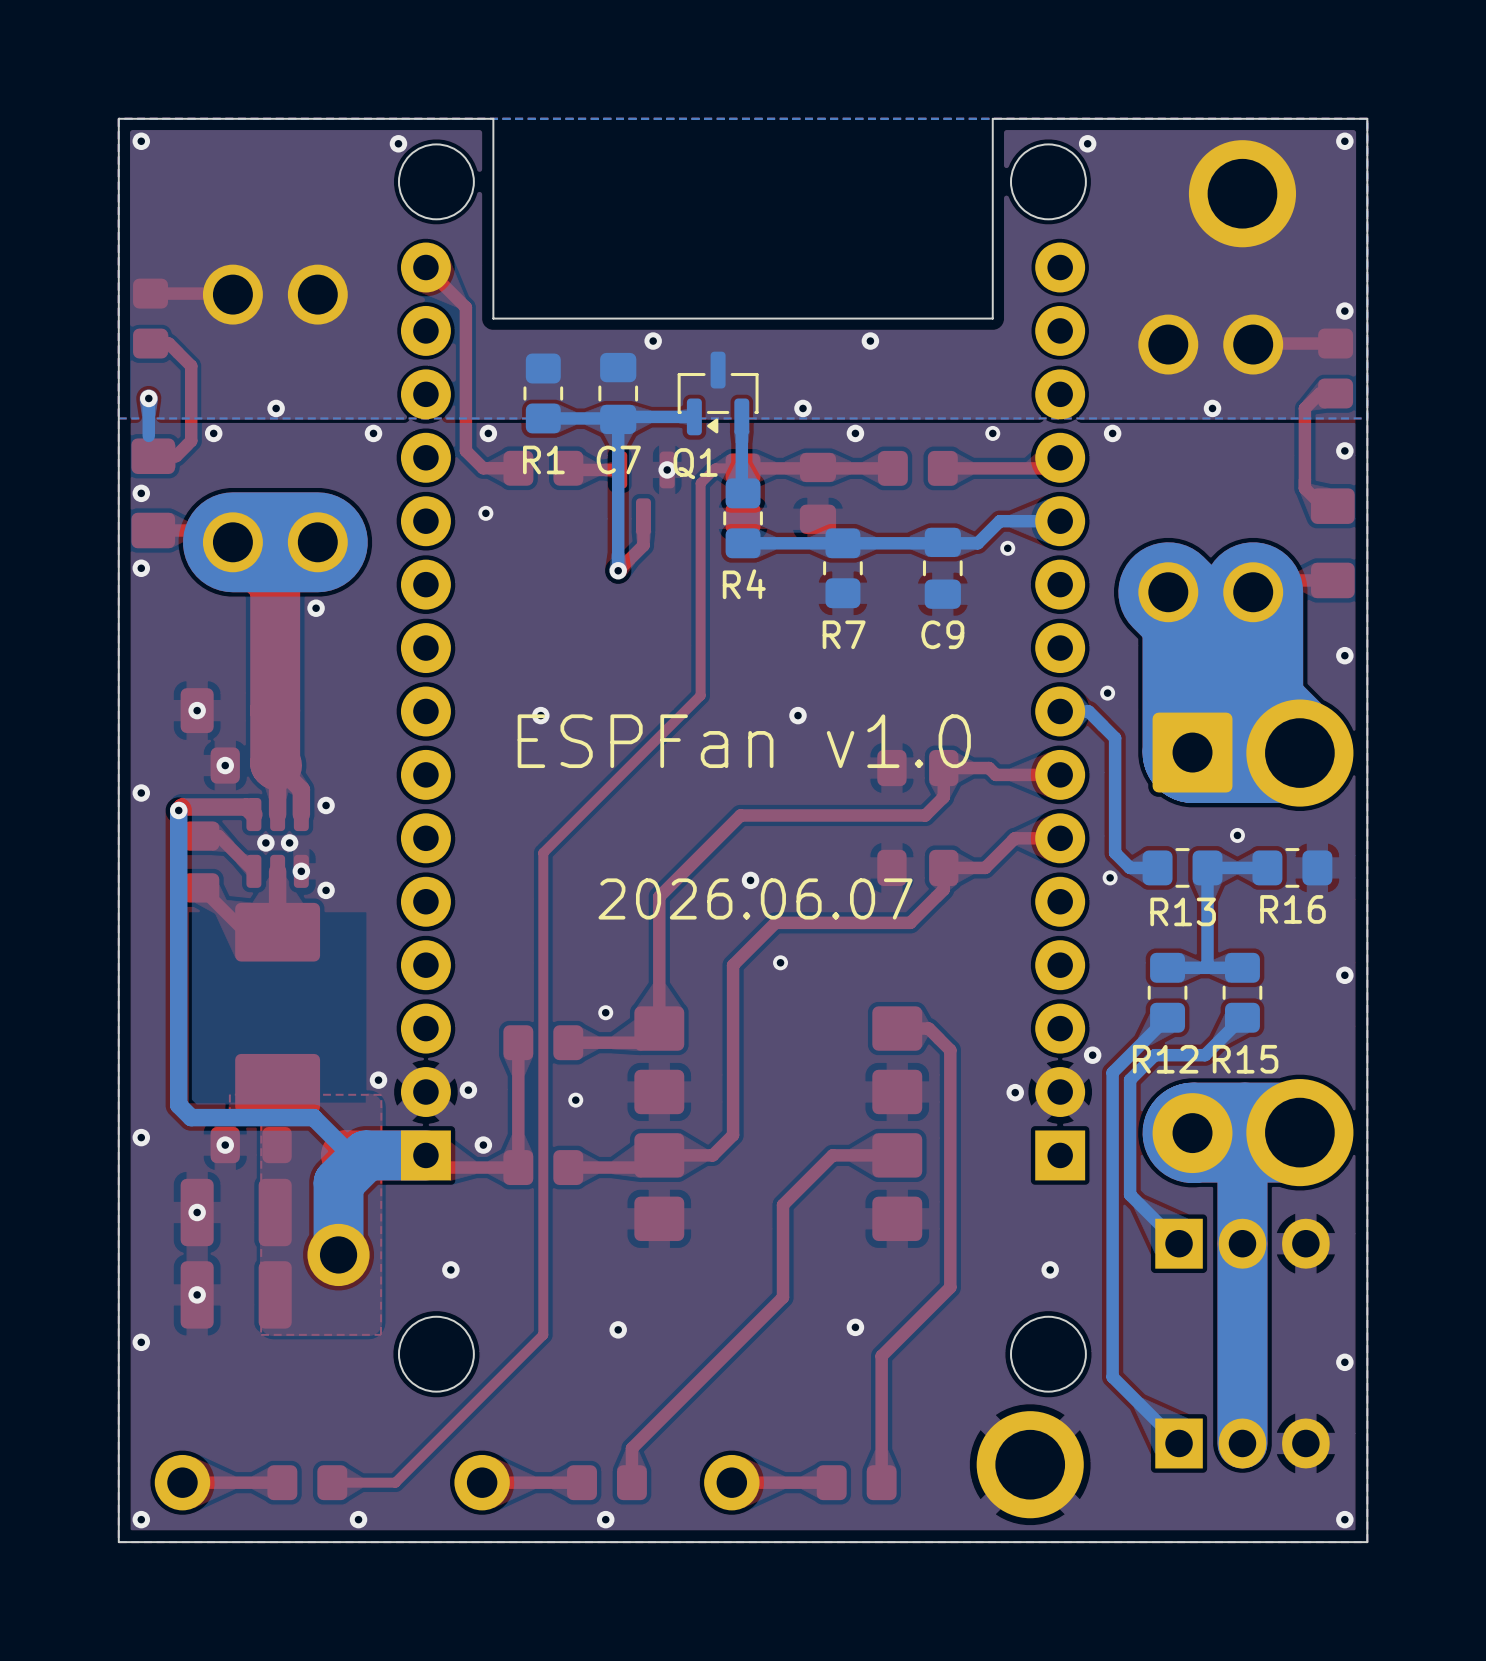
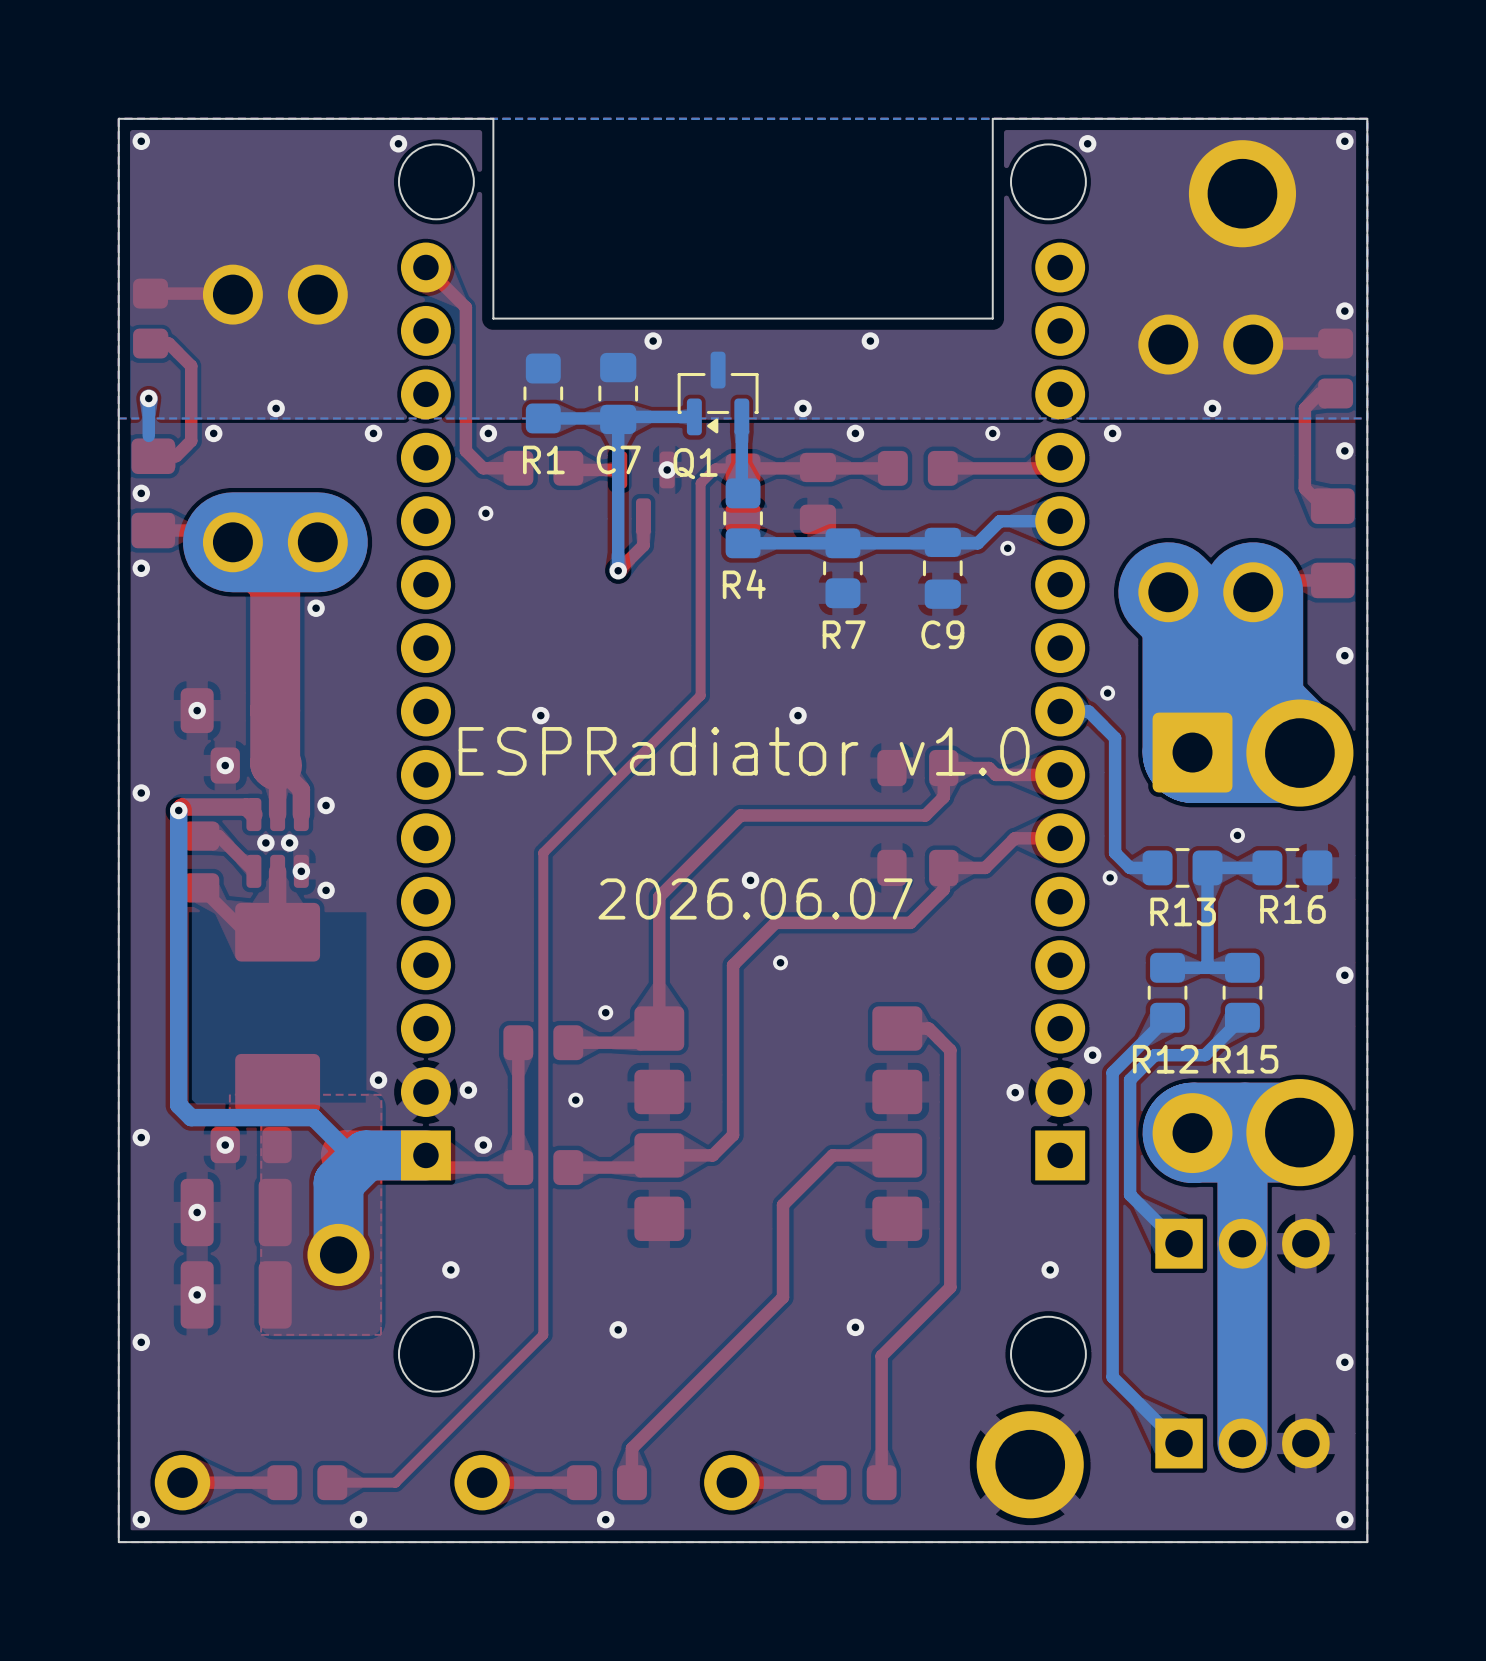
text: ESPFan v1.0 (744, 741) -> ESPRadiator v1.0 (744, 751)

